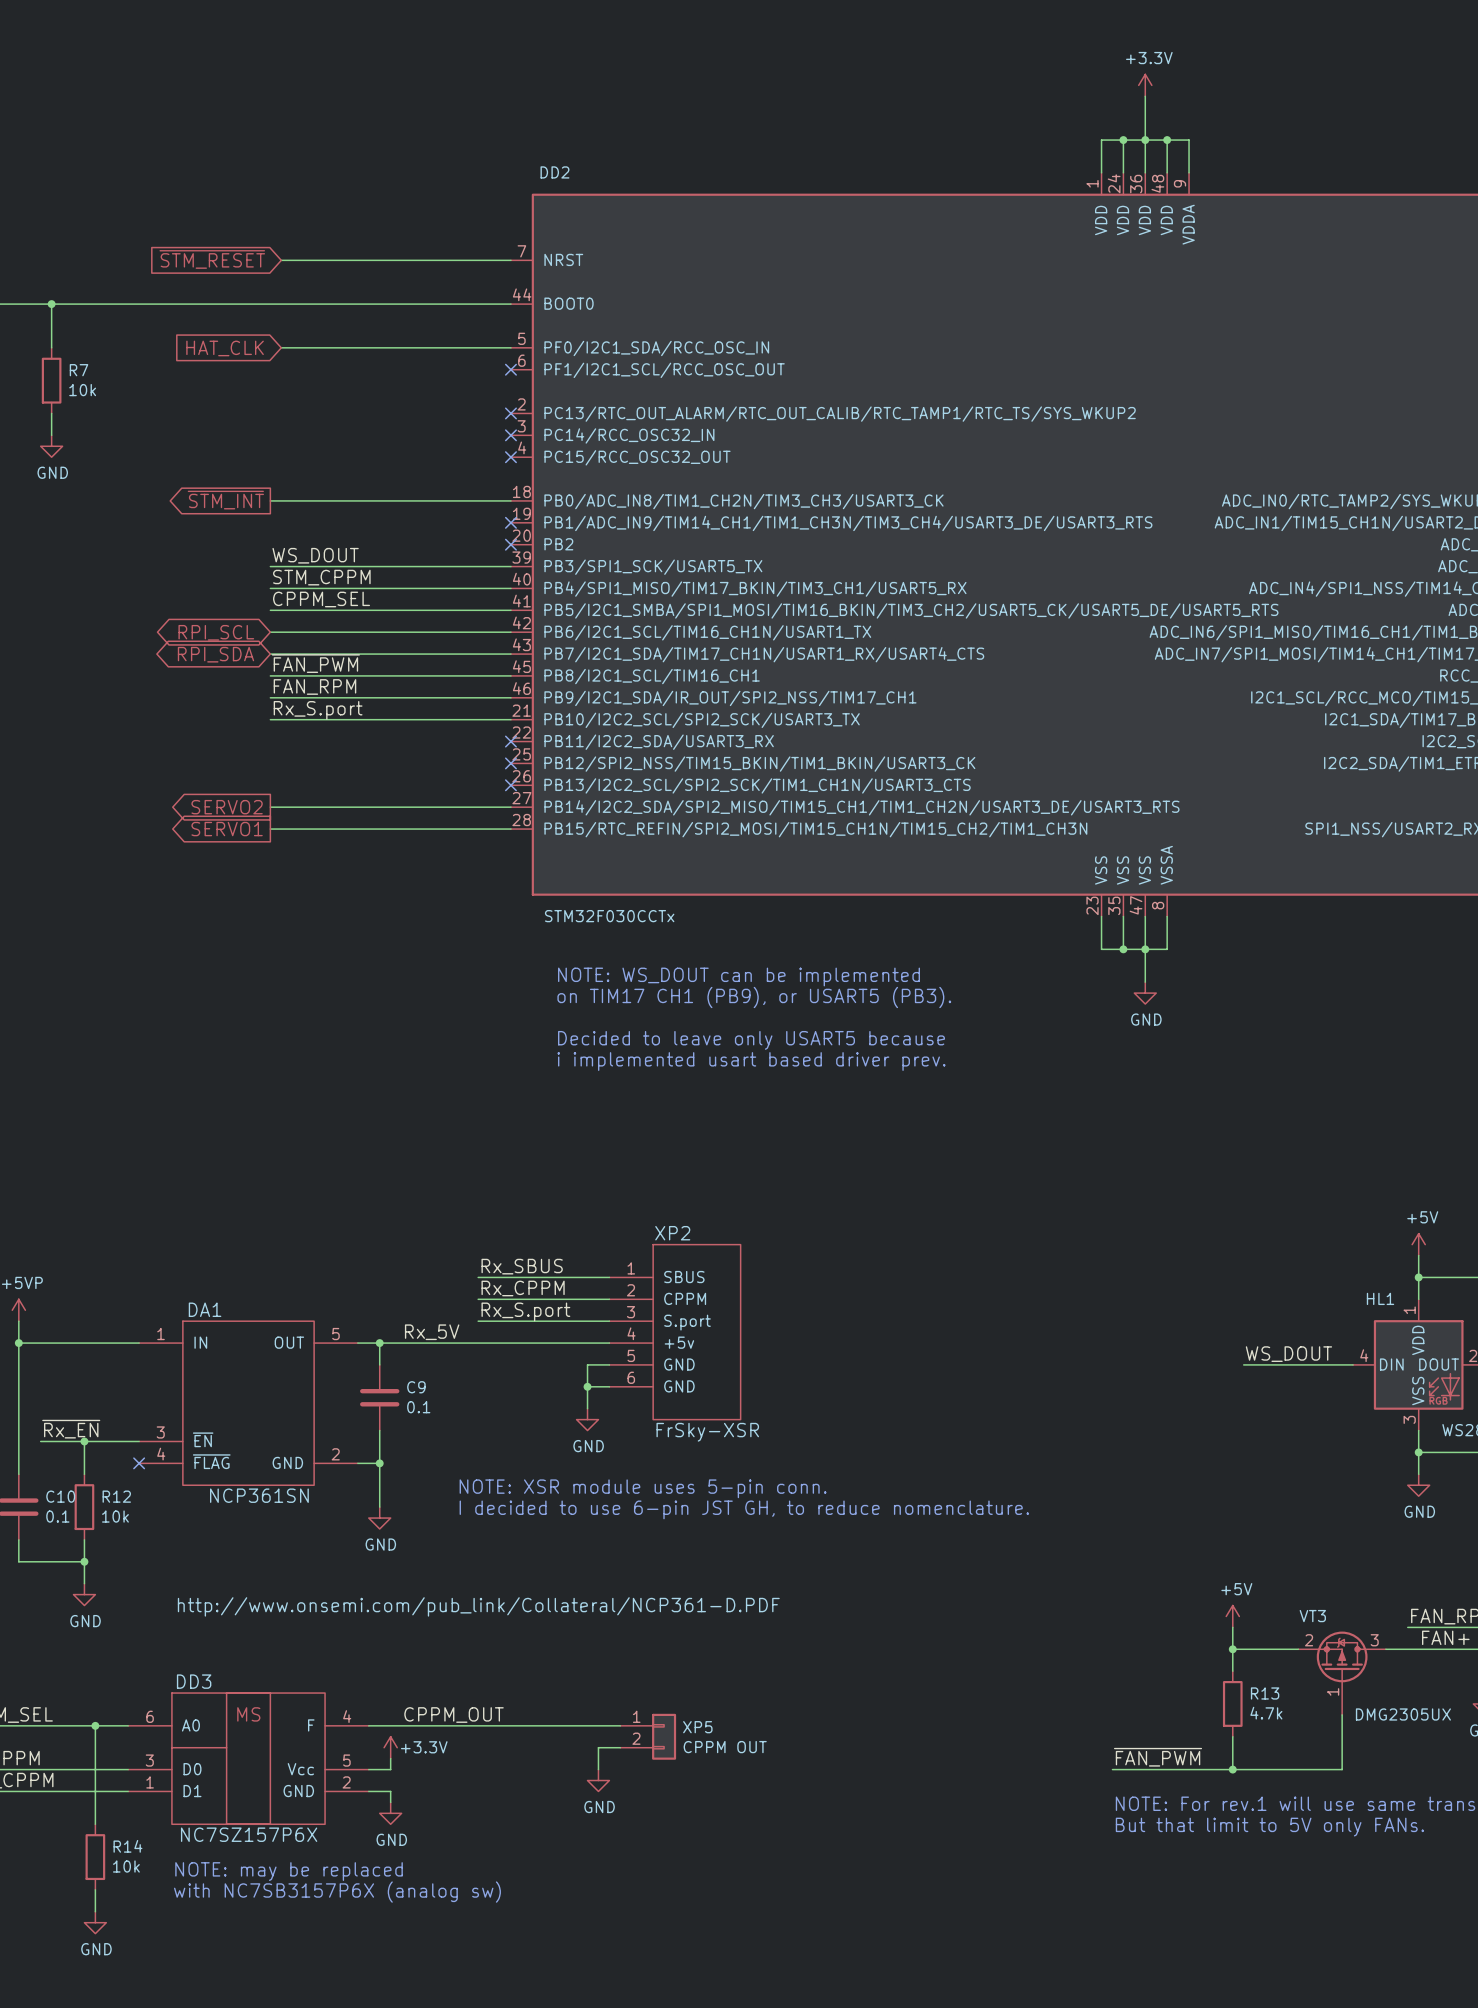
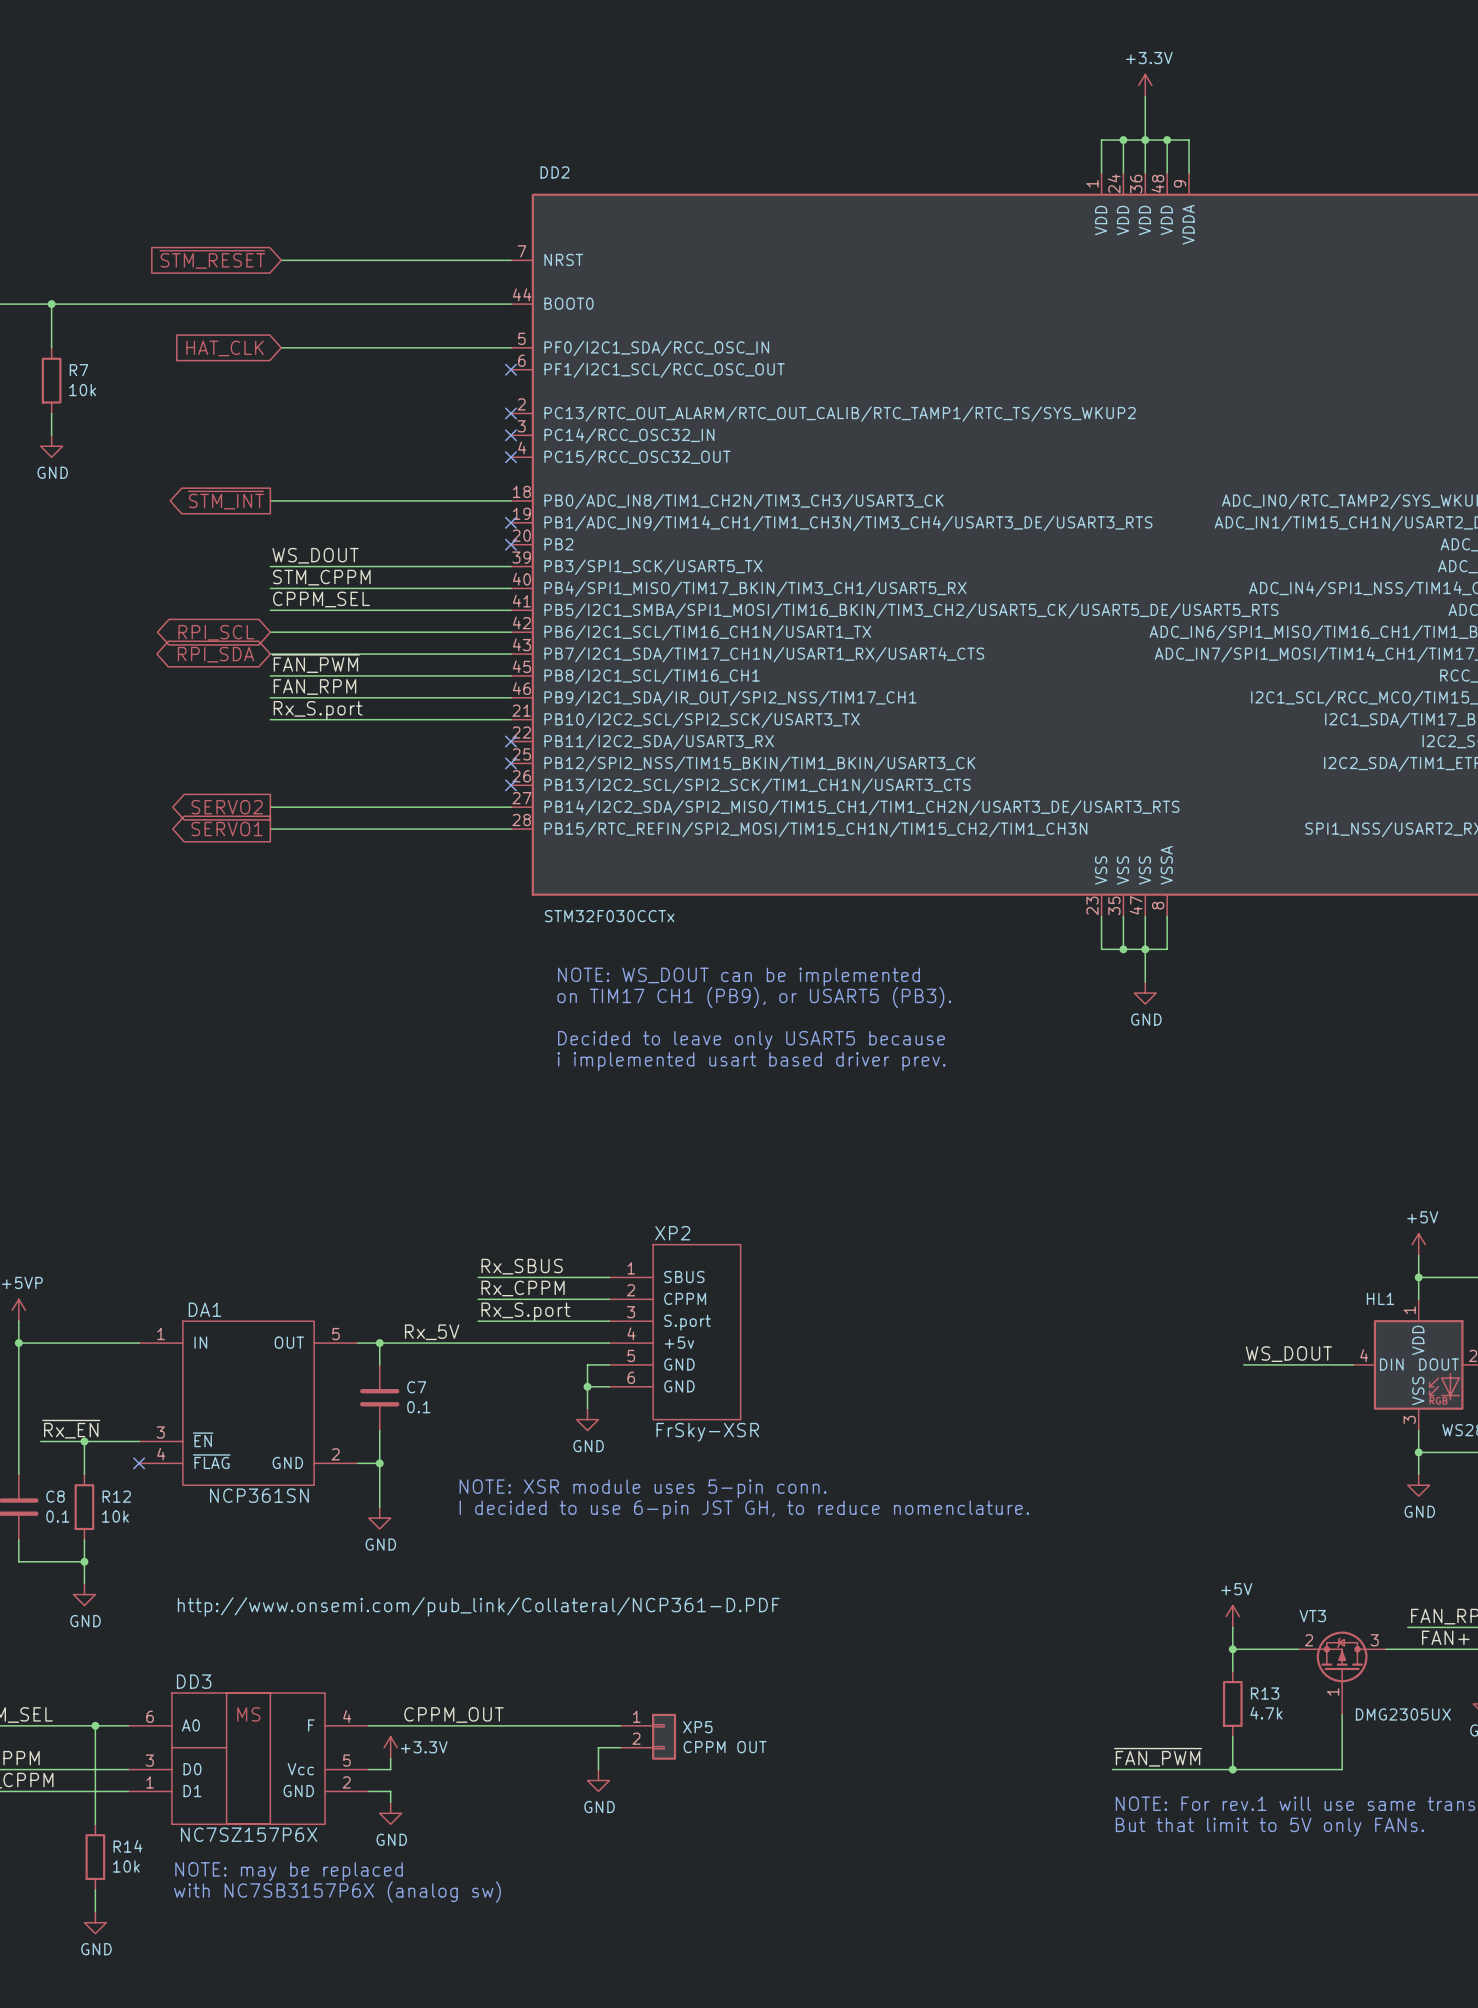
C9 name: C9 (416, 1387) -> C7 (416, 1387)
C10 name: C10 (60, 1496) -> C8 (55, 1496)

